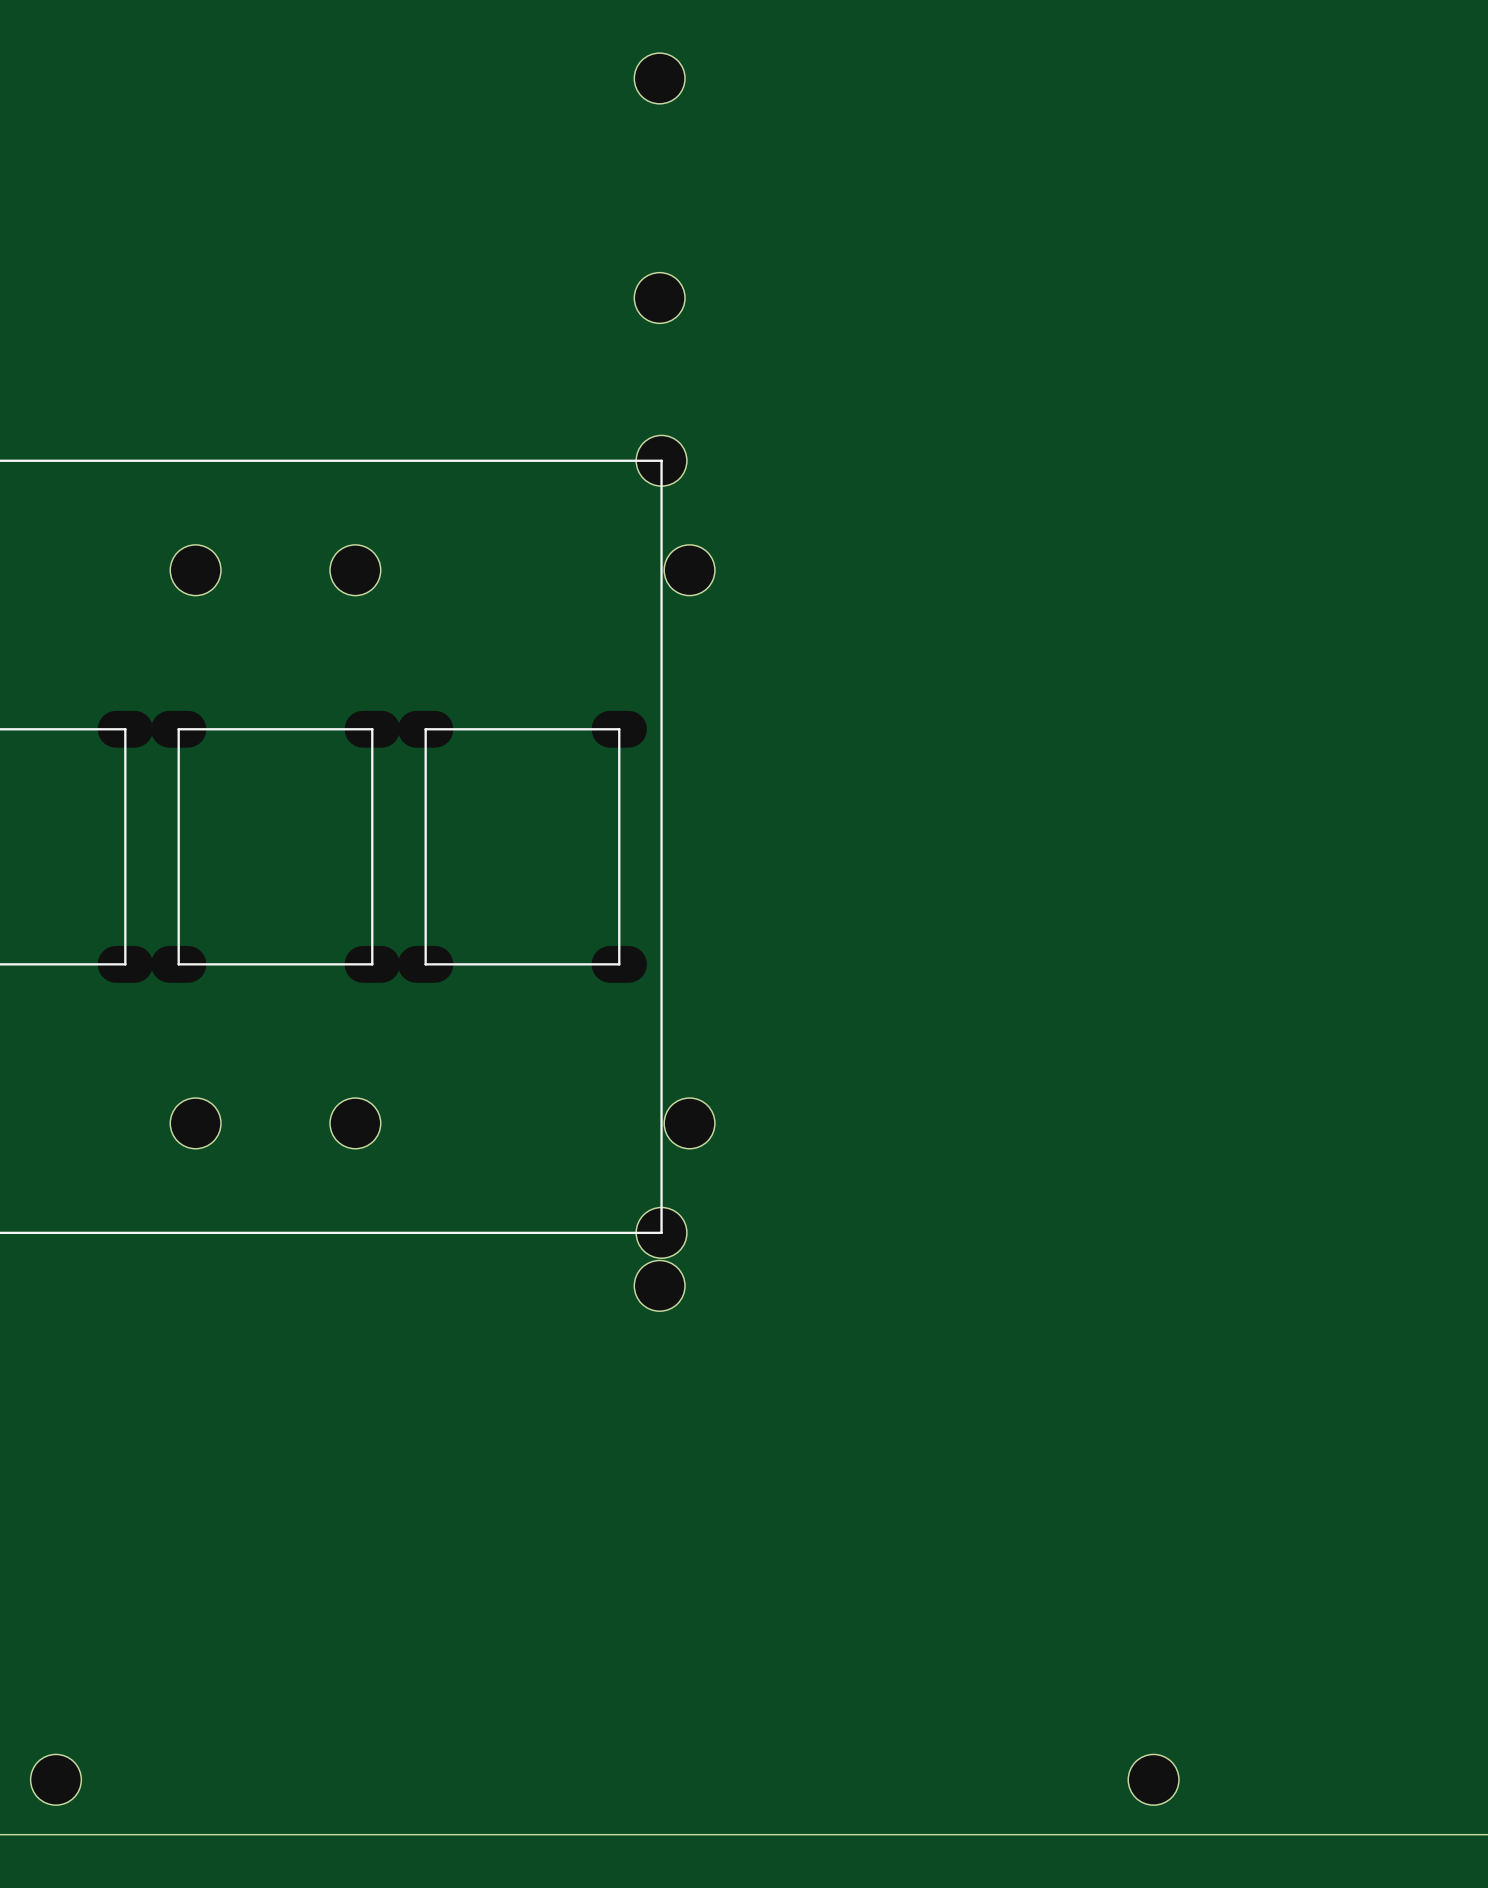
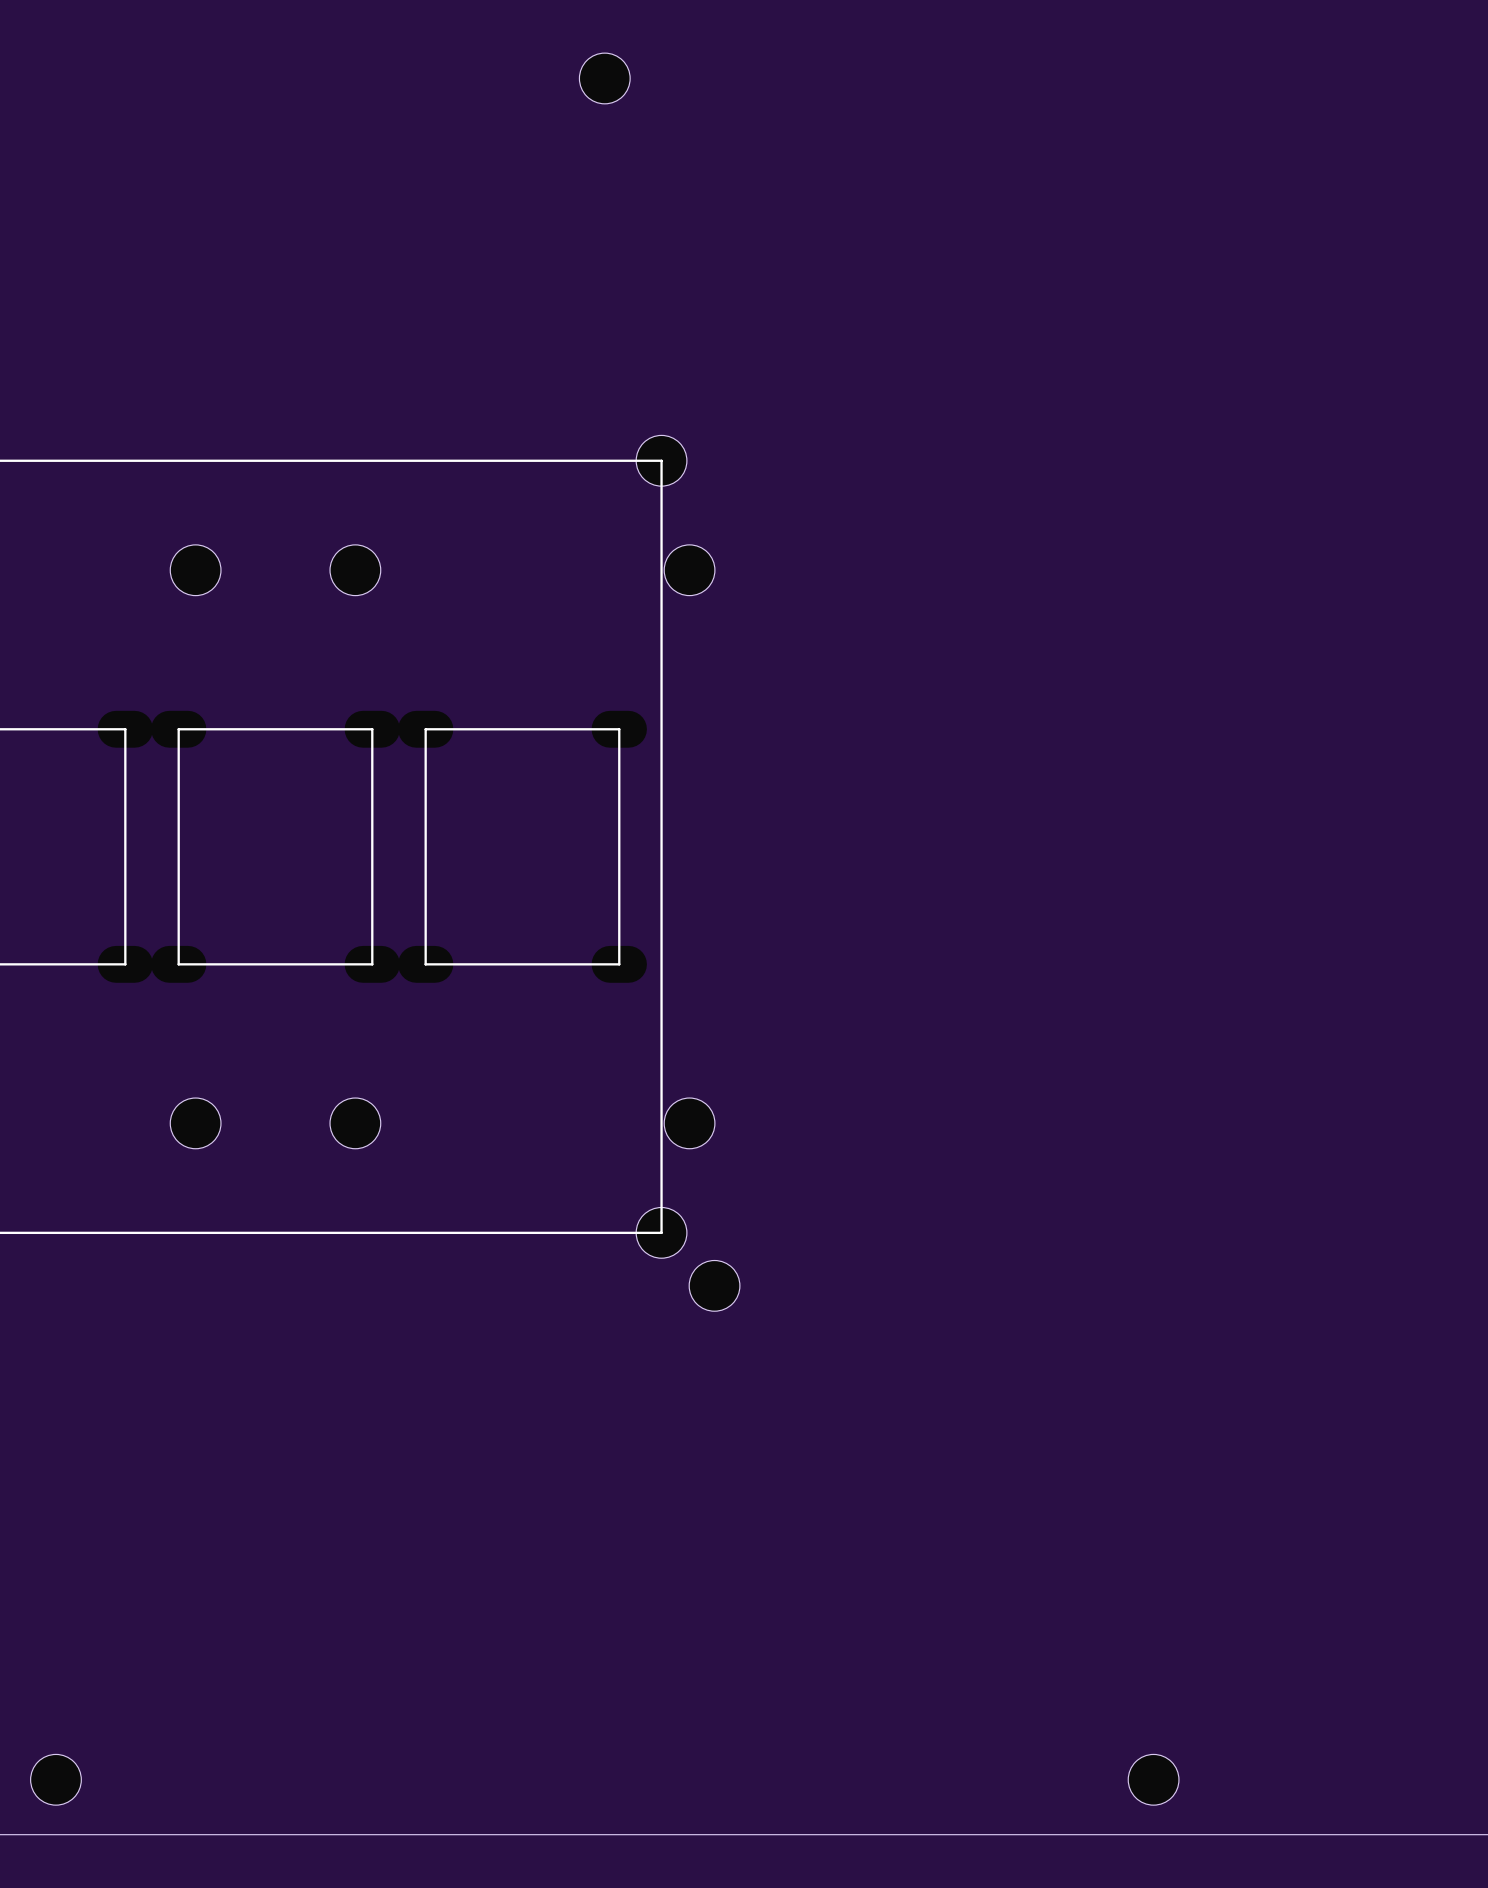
part position: (659, 78) -> (604, 78)
part: (659, 298) -> none
part position: (659, 1285) -> (714, 1285)

